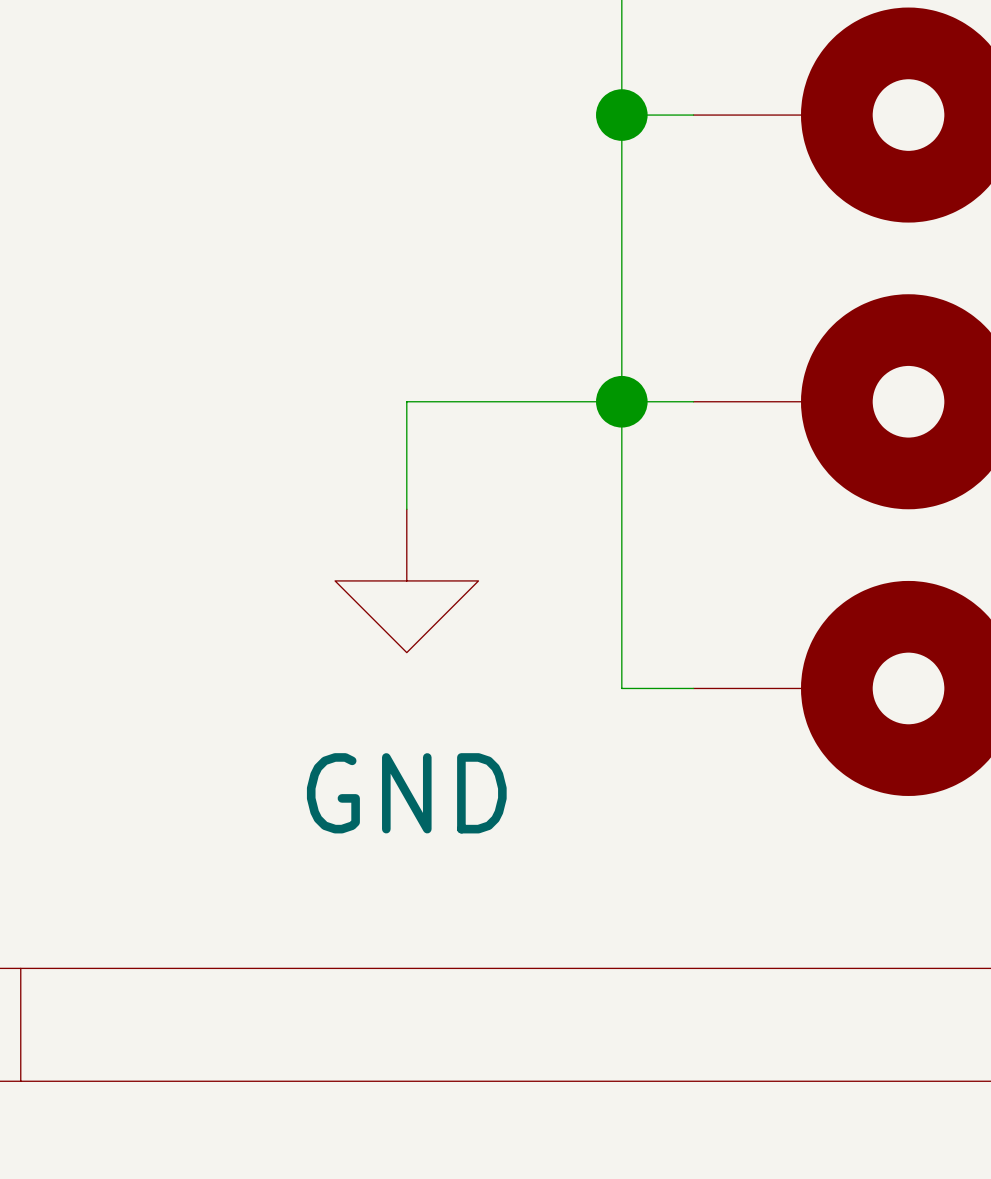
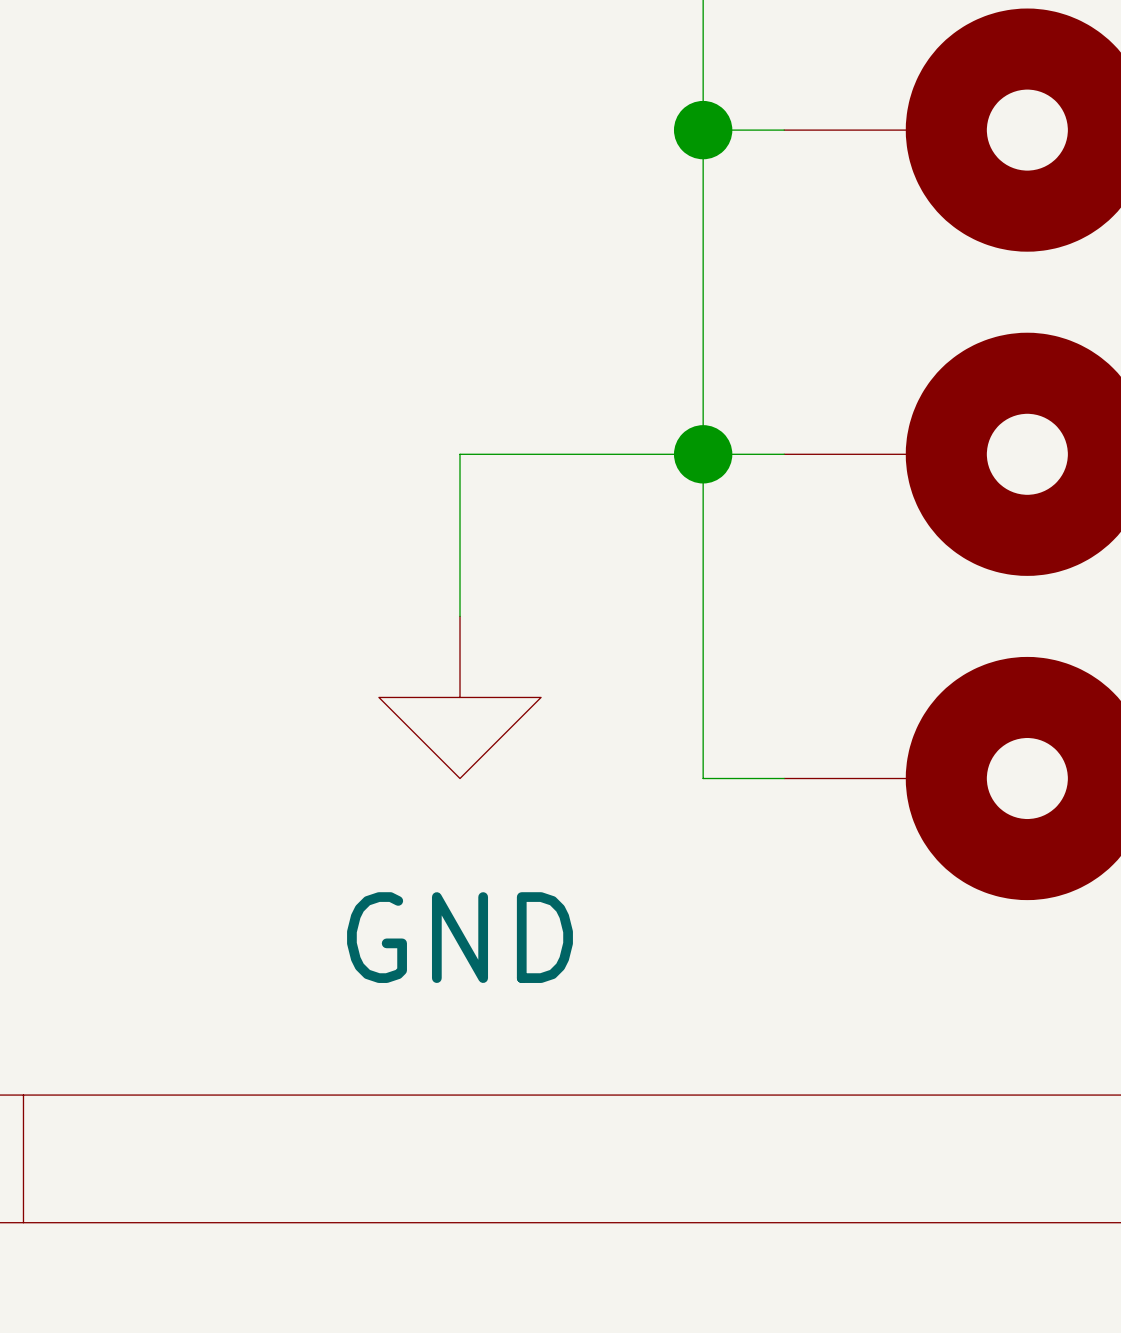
power symbol position: GND (406, 580) -> GND (460, 697)

